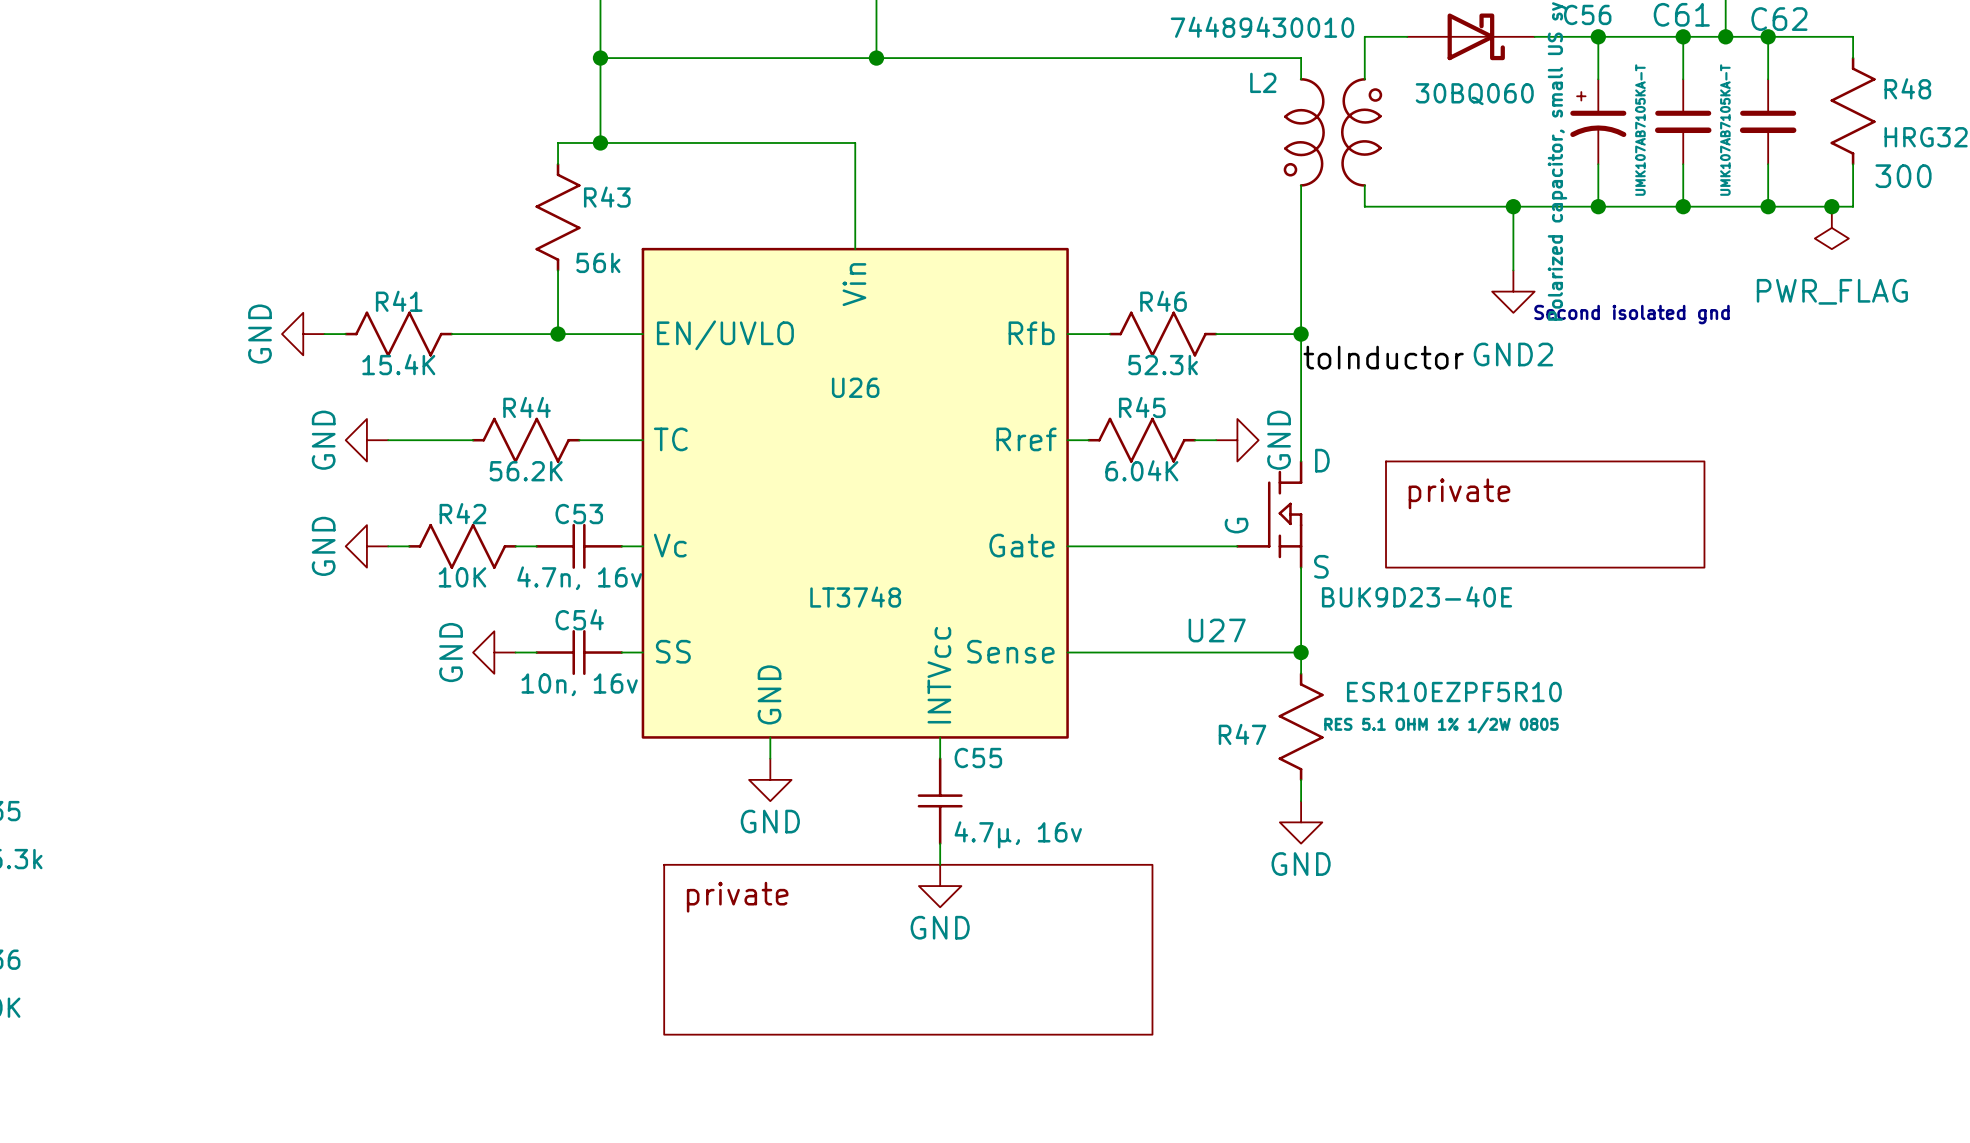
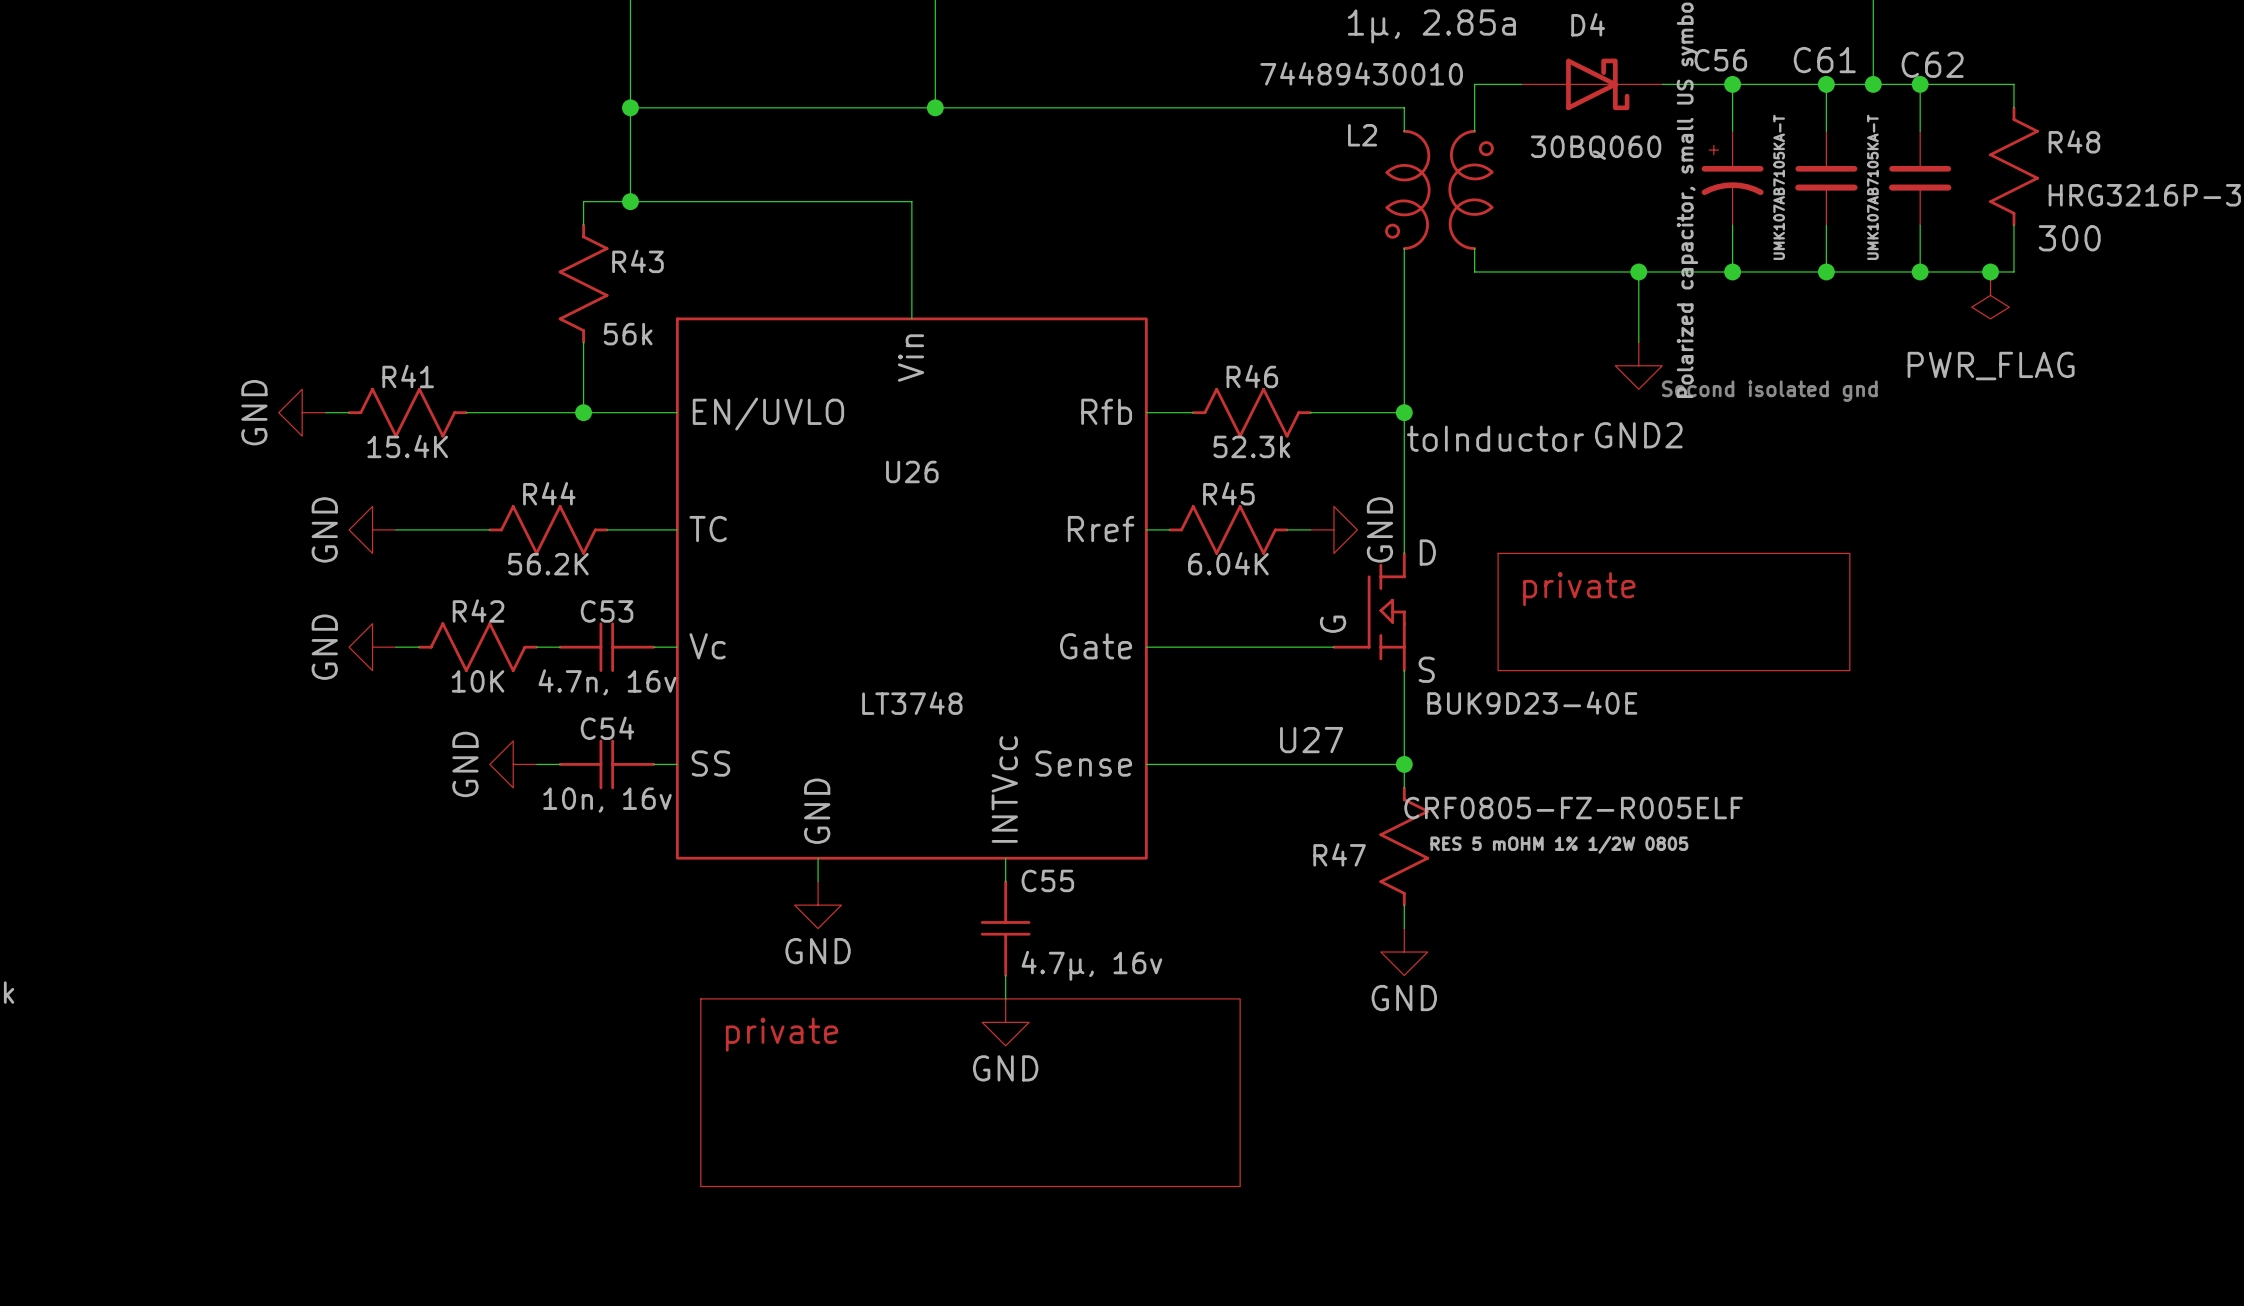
R47 value: ESR10EZPF5R10 (1454, 692) -> CRF0805-FZ-R005ELF (1573, 808)
R47 text: RES 5.1 OHM 1% 1/2W 0805 (1441, 725) -> RES 5 mOHM 1% 1/2W 0805 (1559, 844)

